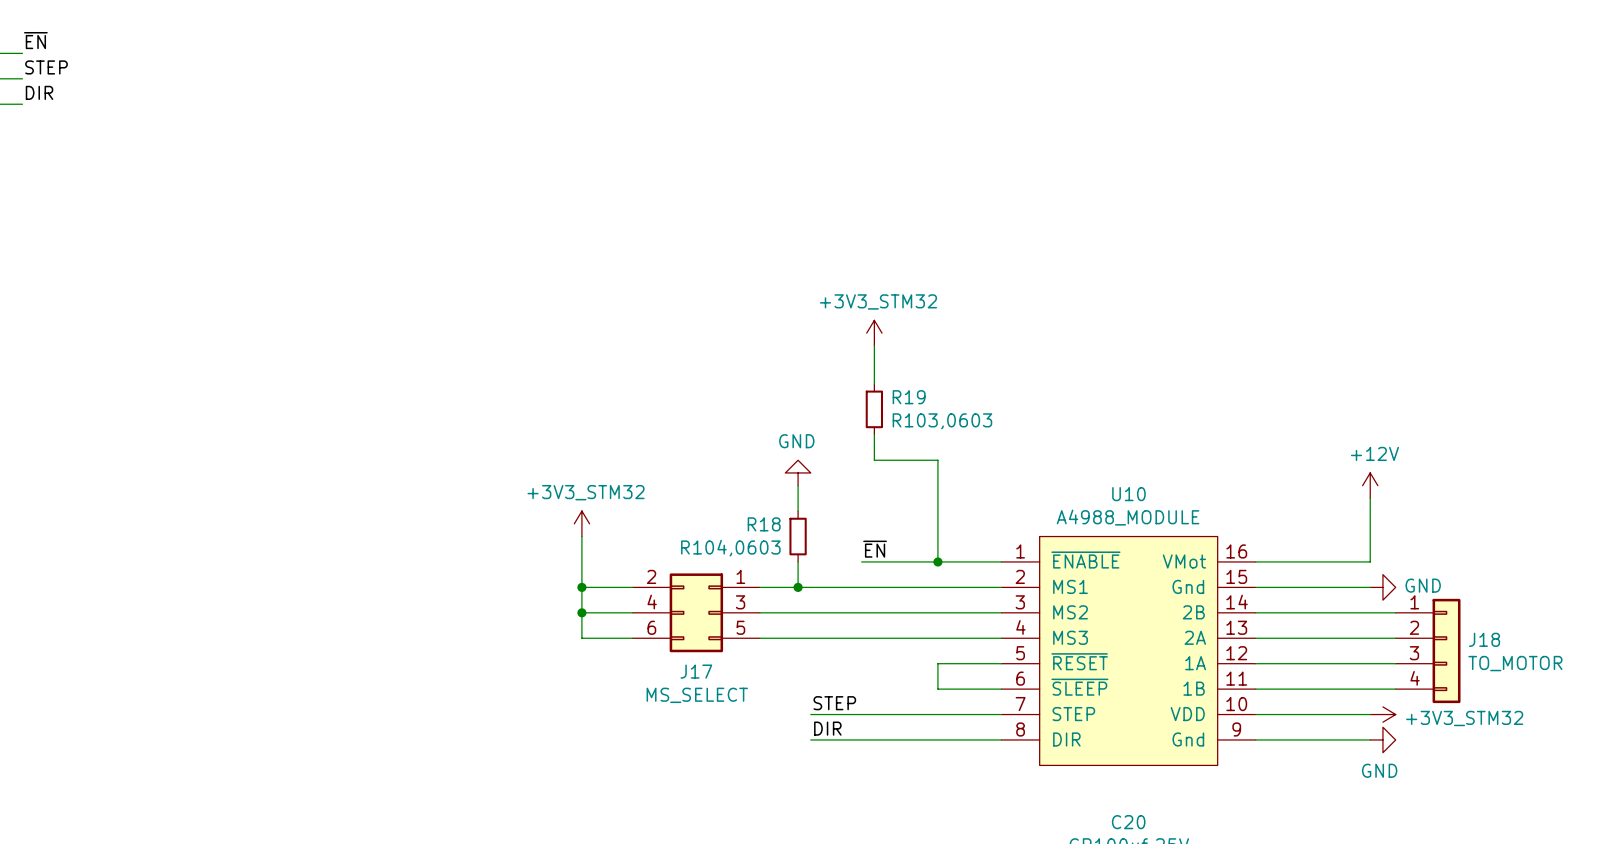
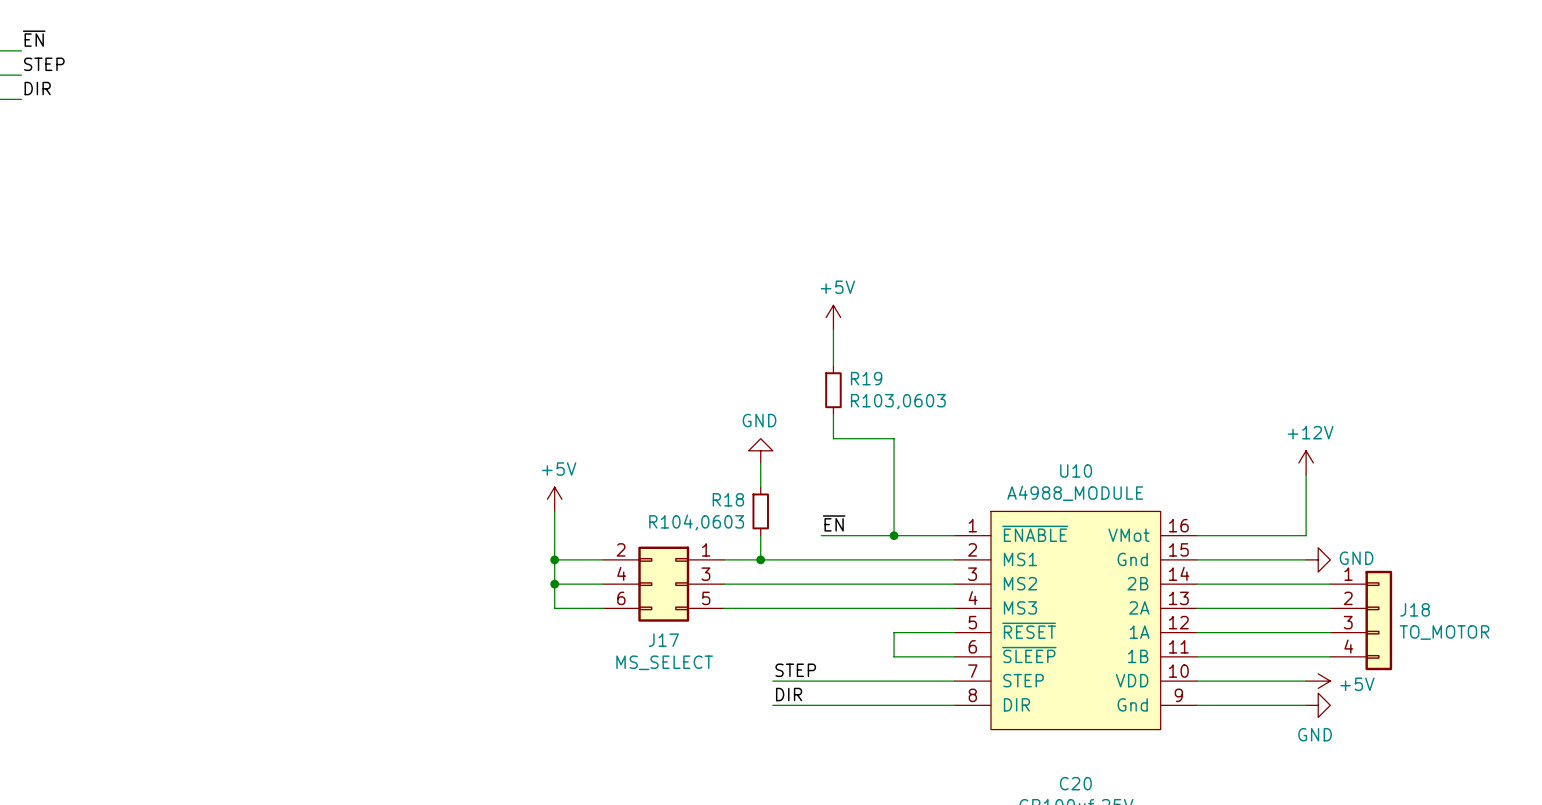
power symbol: +3V3_STM32 (874, 333) -> +5V (833, 317)
power symbol: +3V3_STM32 (581, 523) -> +5V (554, 499)
power symbol: +3V3_STM32 (1382, 714) -> +5V (1318, 681)

